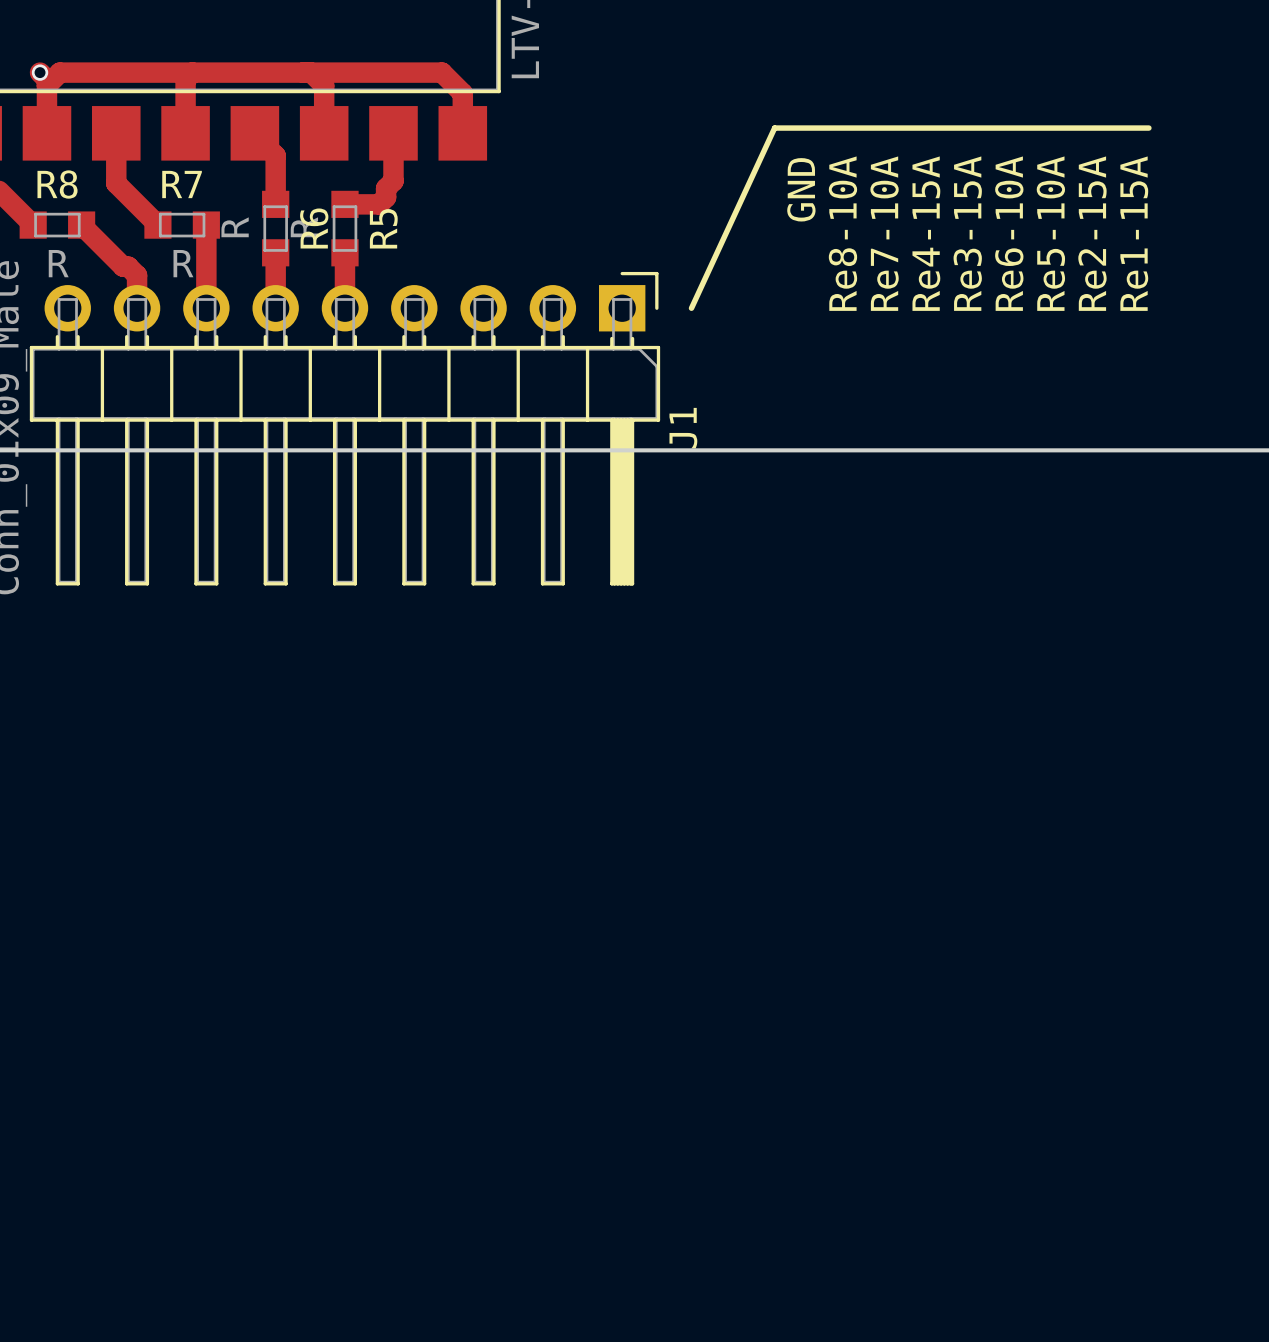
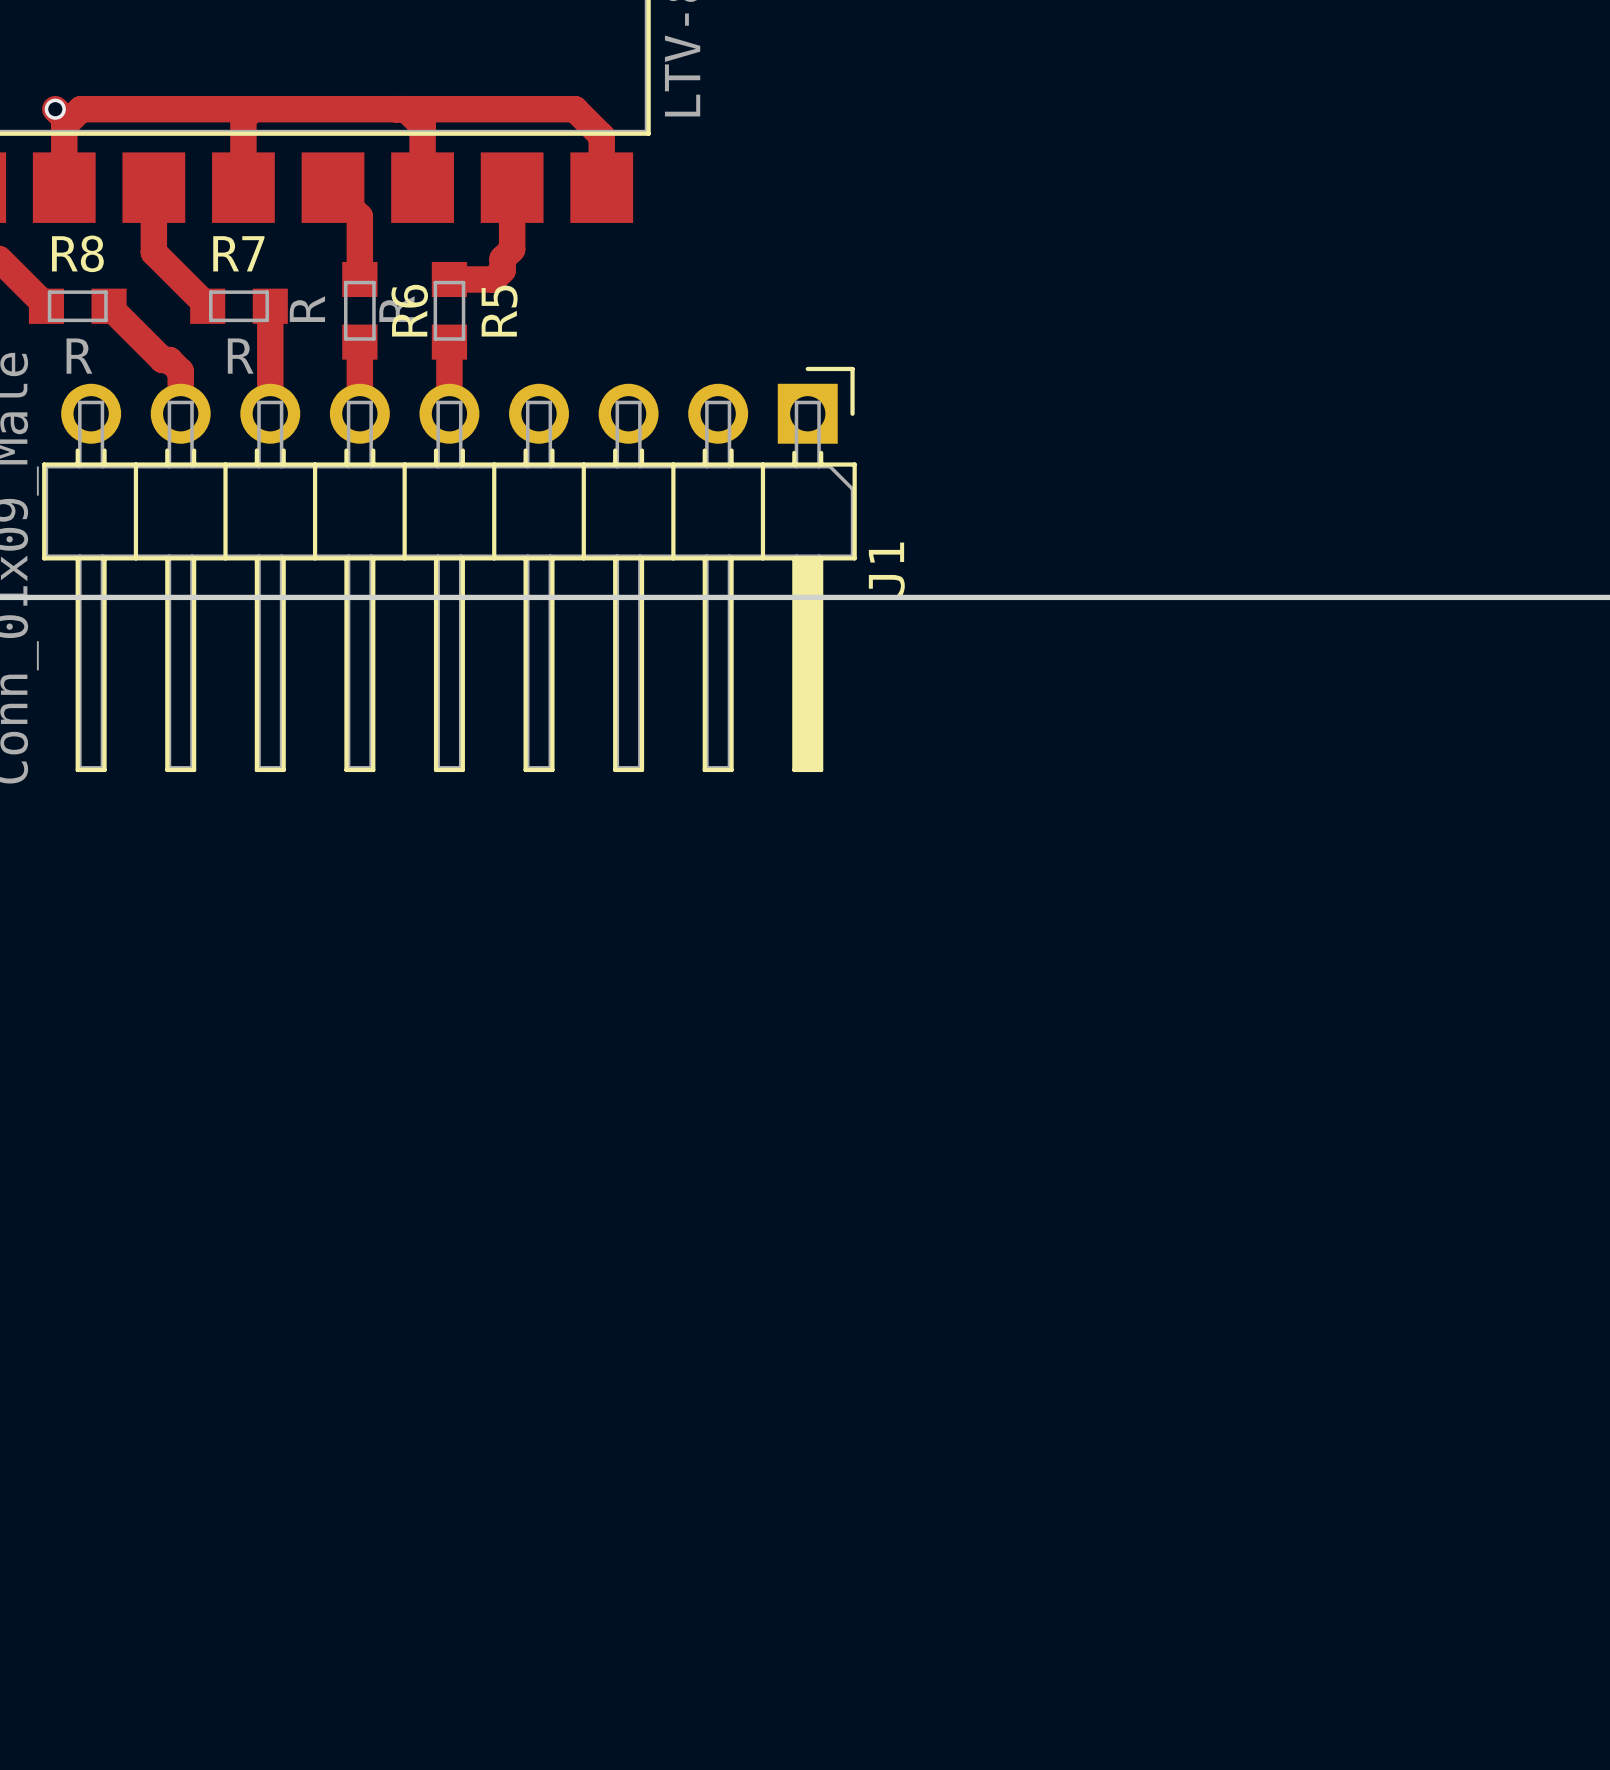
line: (1148, 128) (774, 128) (691, 308) -> none
text: GND (801, 189) -> none
text: Re8-10A (842, 233) -> none
text: Re7-10A (884, 233) -> none
text: Re4-15A (926, 233) -> none
text: Re3-15A (967, 233) -> none
text: Re6-10A (1009, 233) -> none
text: Re5-10A (1050, 233) -> none
text: Re2-15A (1092, 233) -> none
text: Re1-15A (1134, 233) -> none

